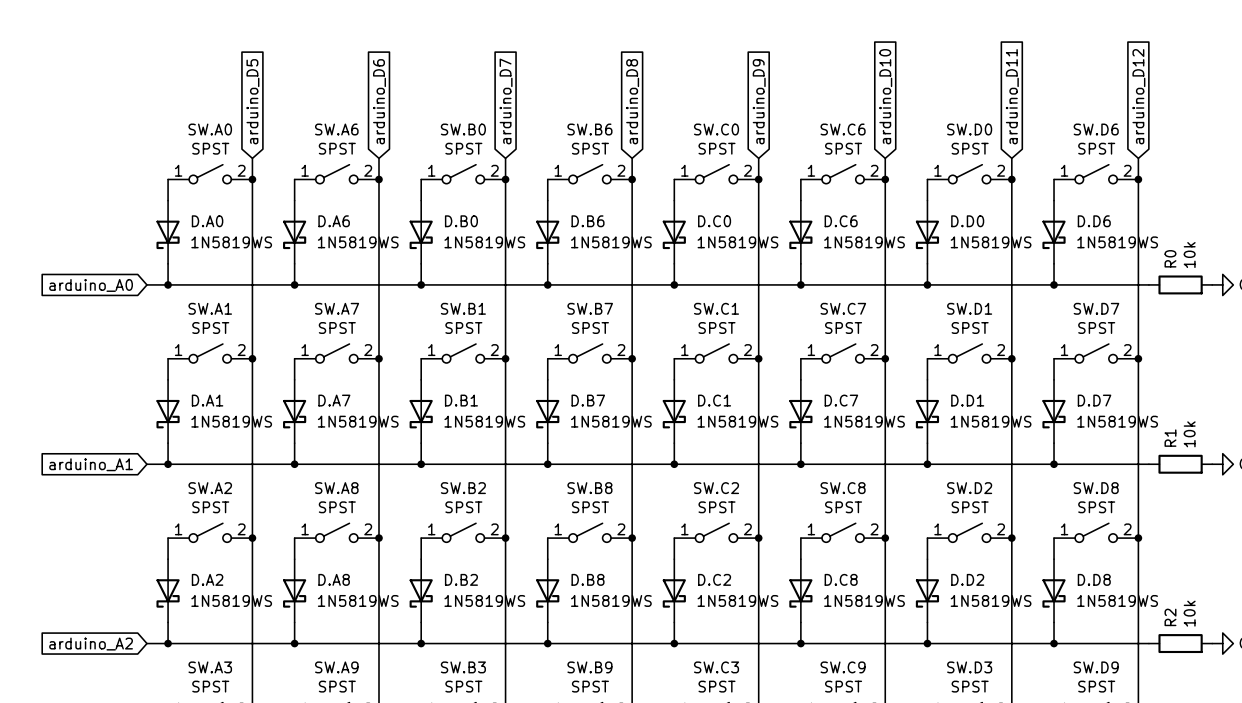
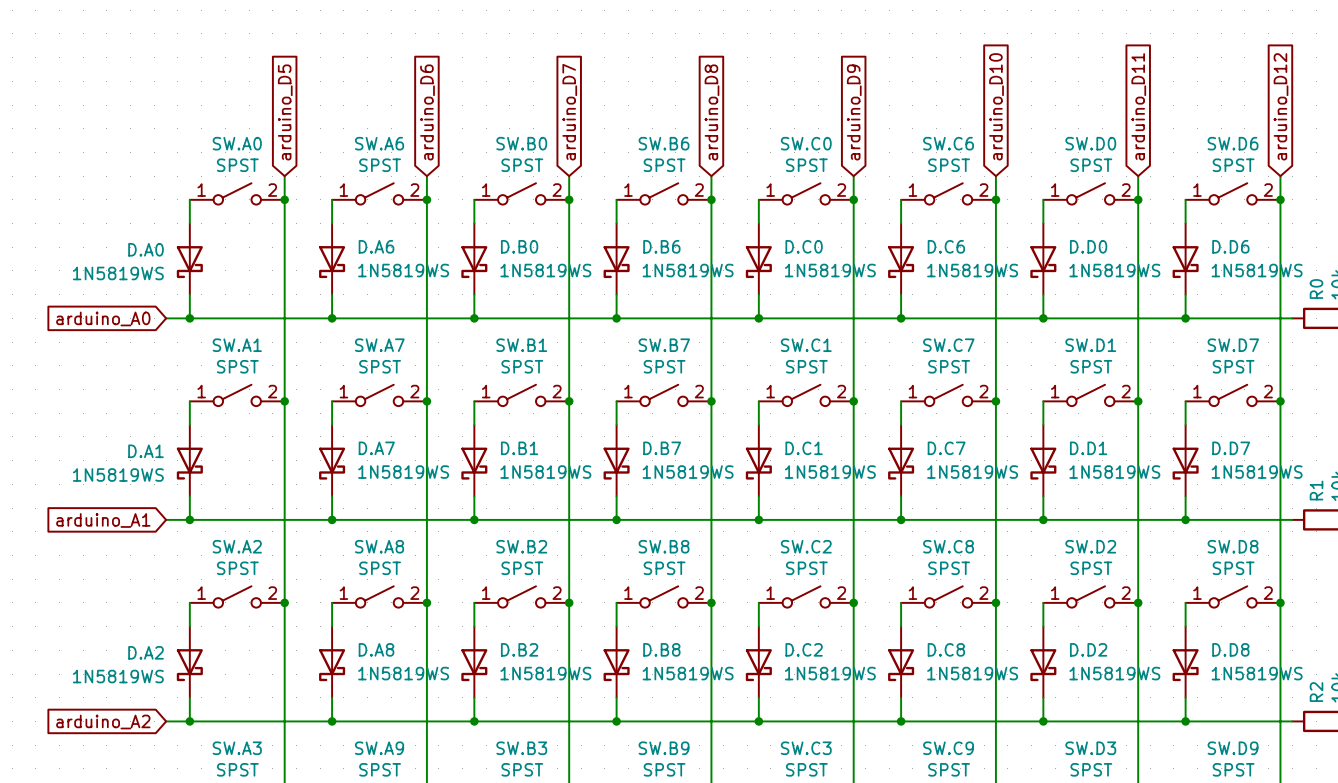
D.A0 name position: D.A0 (207, 221) -> D.A0 (146, 249)
D.A0 value position: 1N5819WS (231, 242) -> 1N5819WS (118, 273)
D.A1 name position: D.A1 (207, 400) -> D.A1 (146, 451)
D.A1 value position: 1N5819WS (231, 421) -> 1N5819WS (118, 475)
D.A2 name position: D.A2 (207, 579) -> D.A2 (146, 652)
D.A2 value position: 1N5819WS (231, 600) -> 1N5819WS (118, 676)

